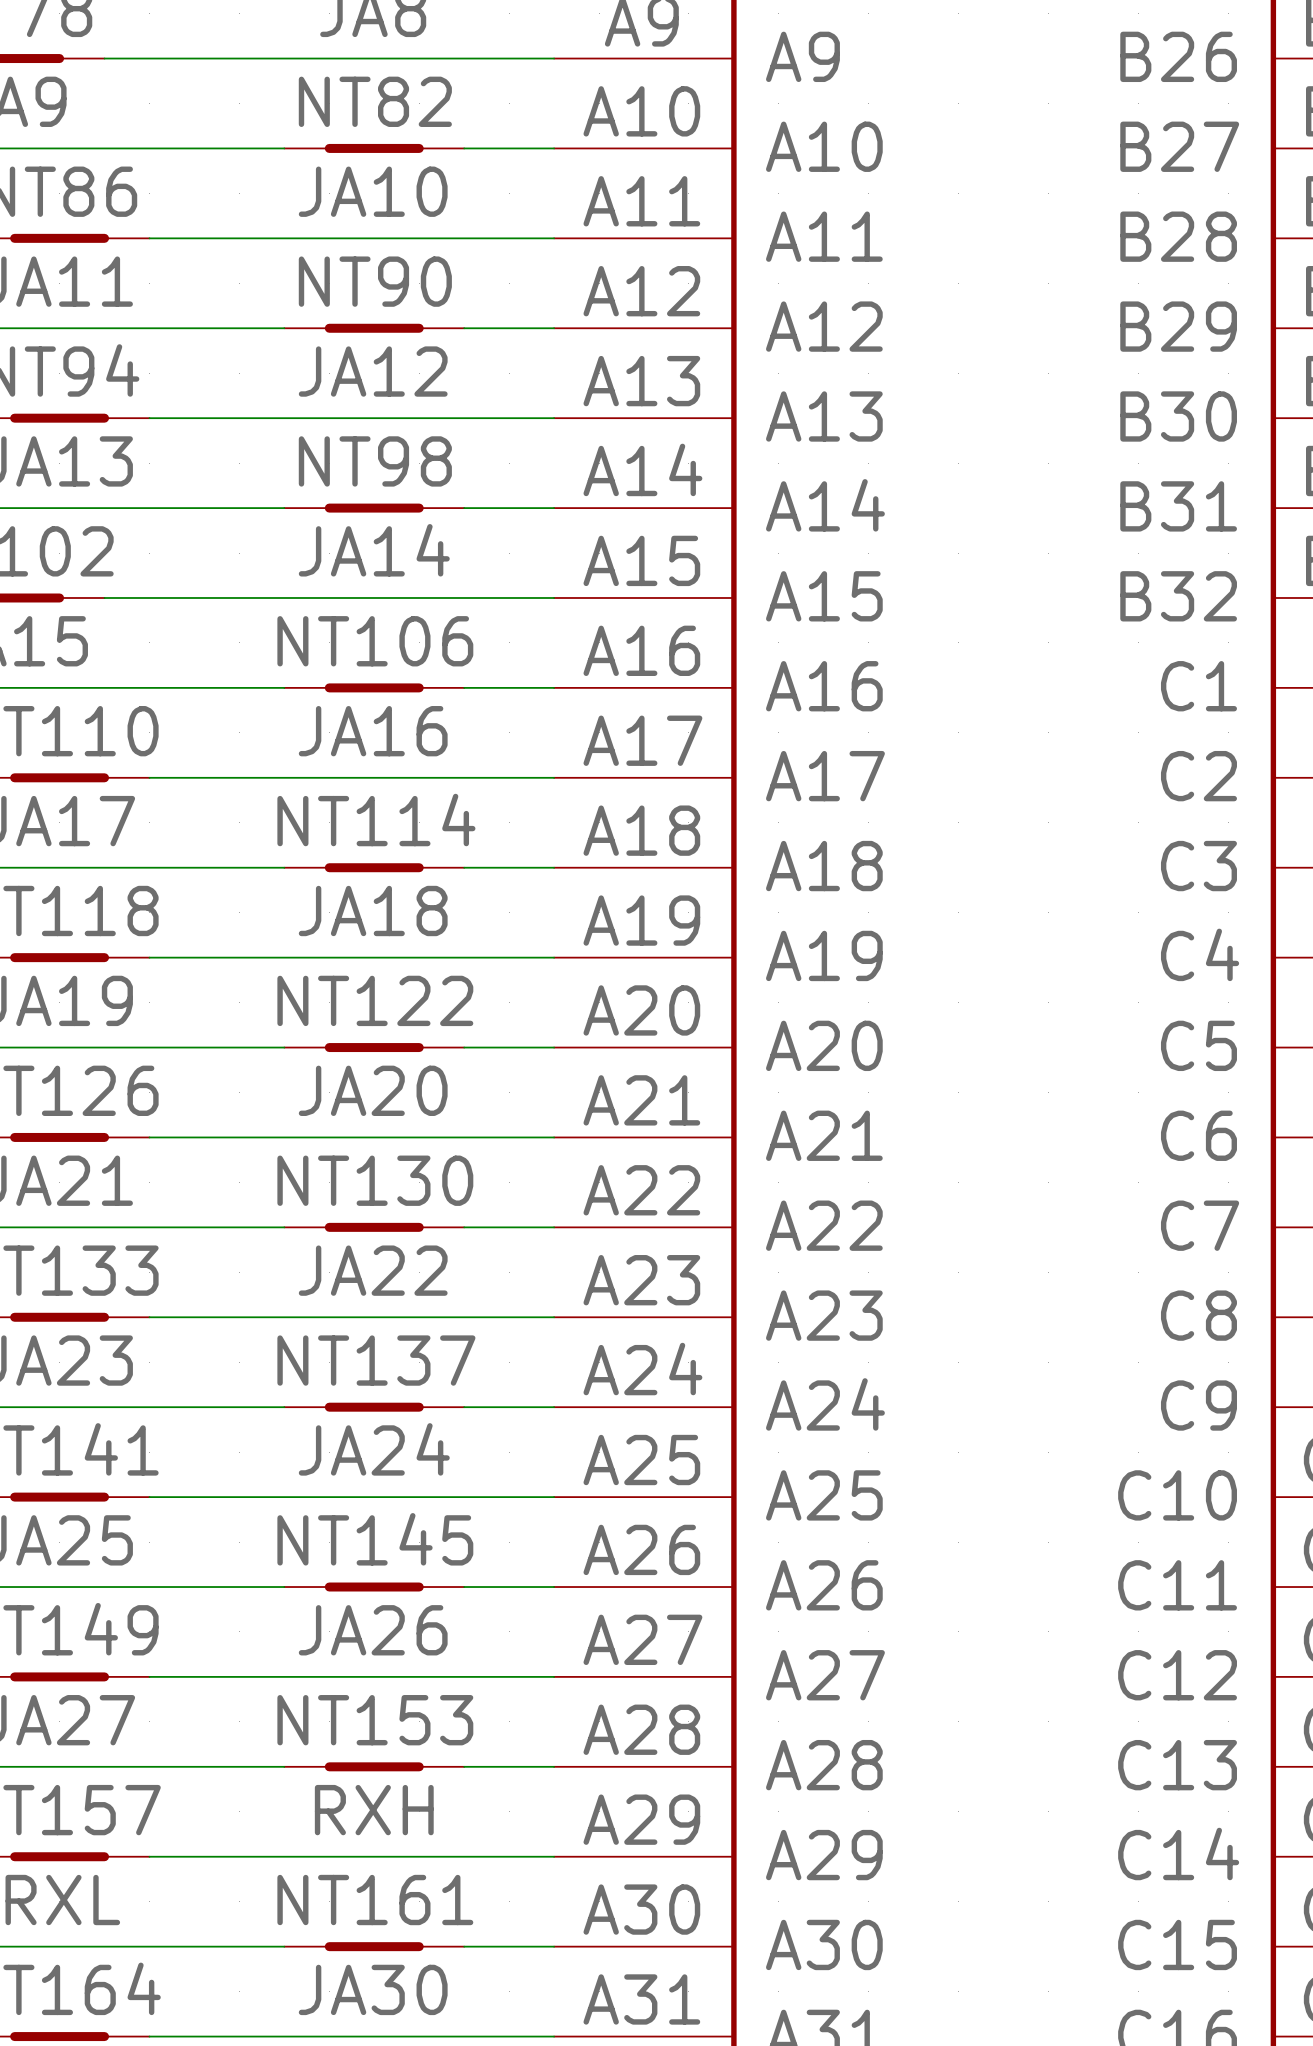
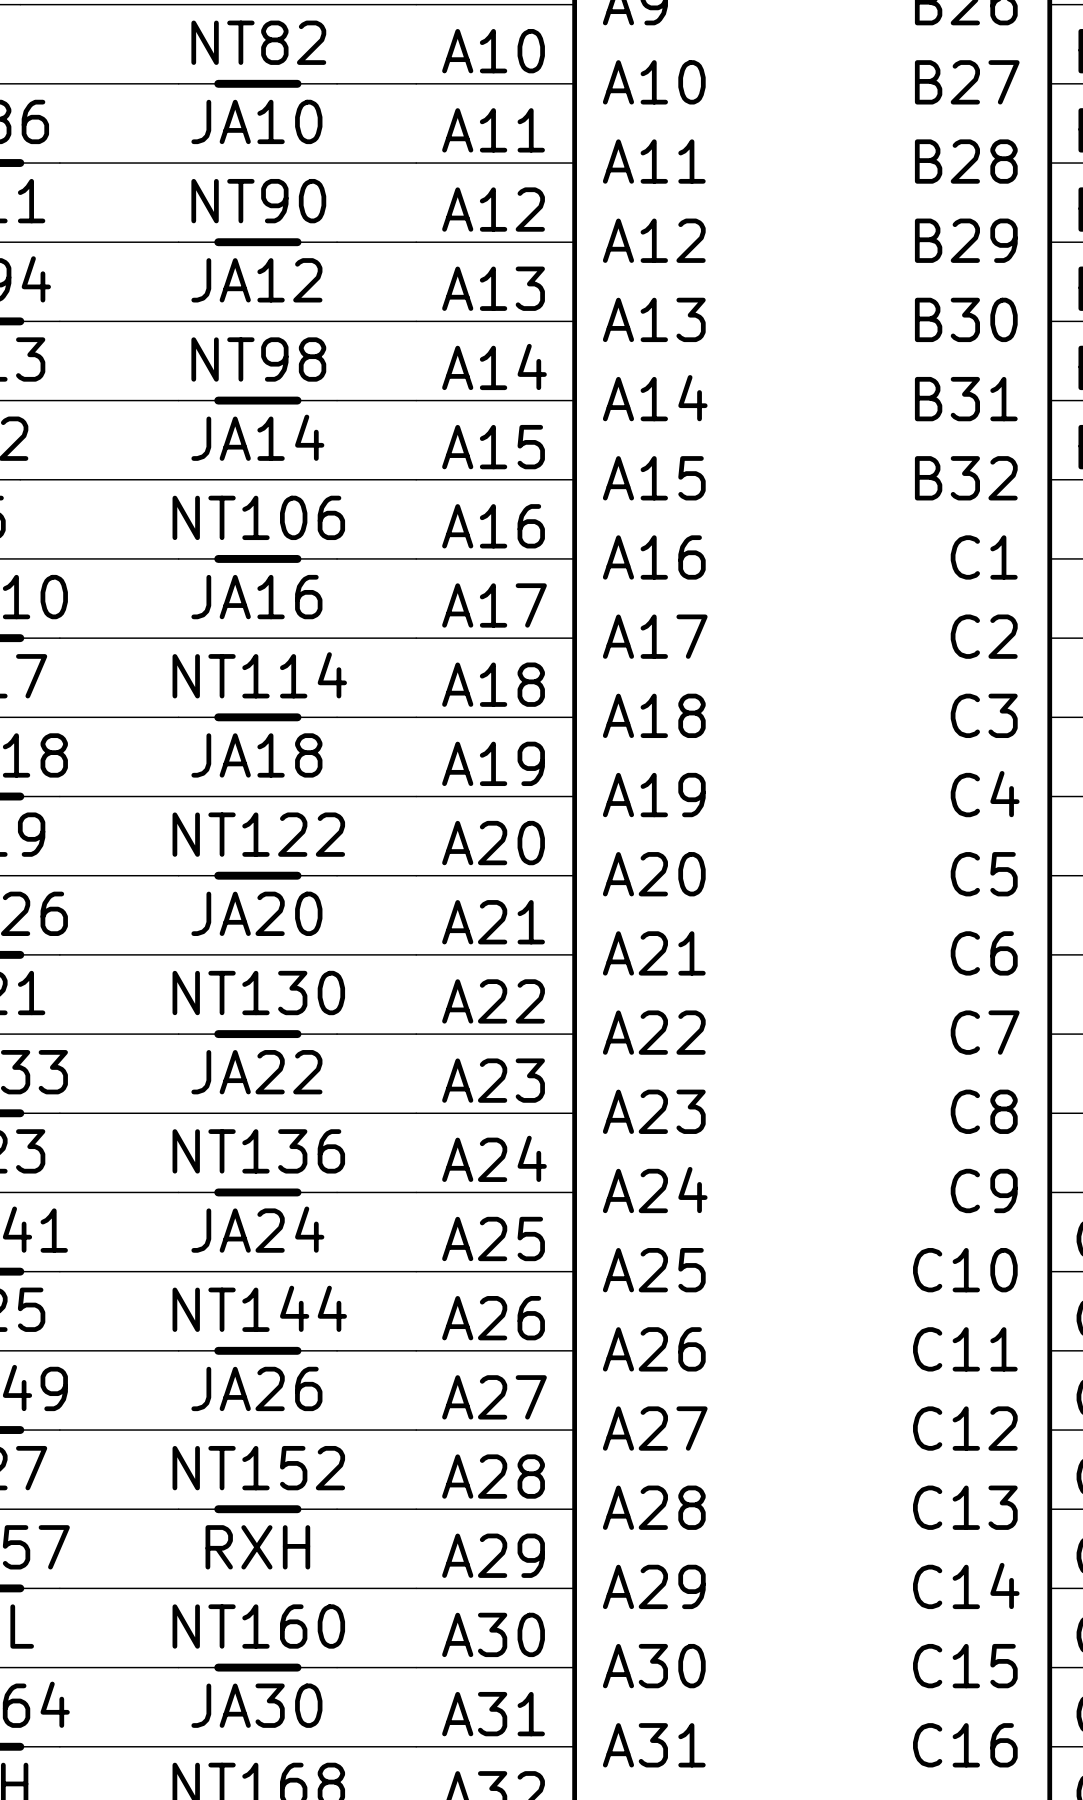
NT137 name: NT137 (376, 1360) -> NT136 (258, 1151)
NT145 name: NT145 (375, 1539) -> NT144 (259, 1308)
NT153 name: NT153 (375, 1720) -> NT152 (258, 1468)
NT161 name: NT161 (375, 1900) -> NT160 (258, 1626)

